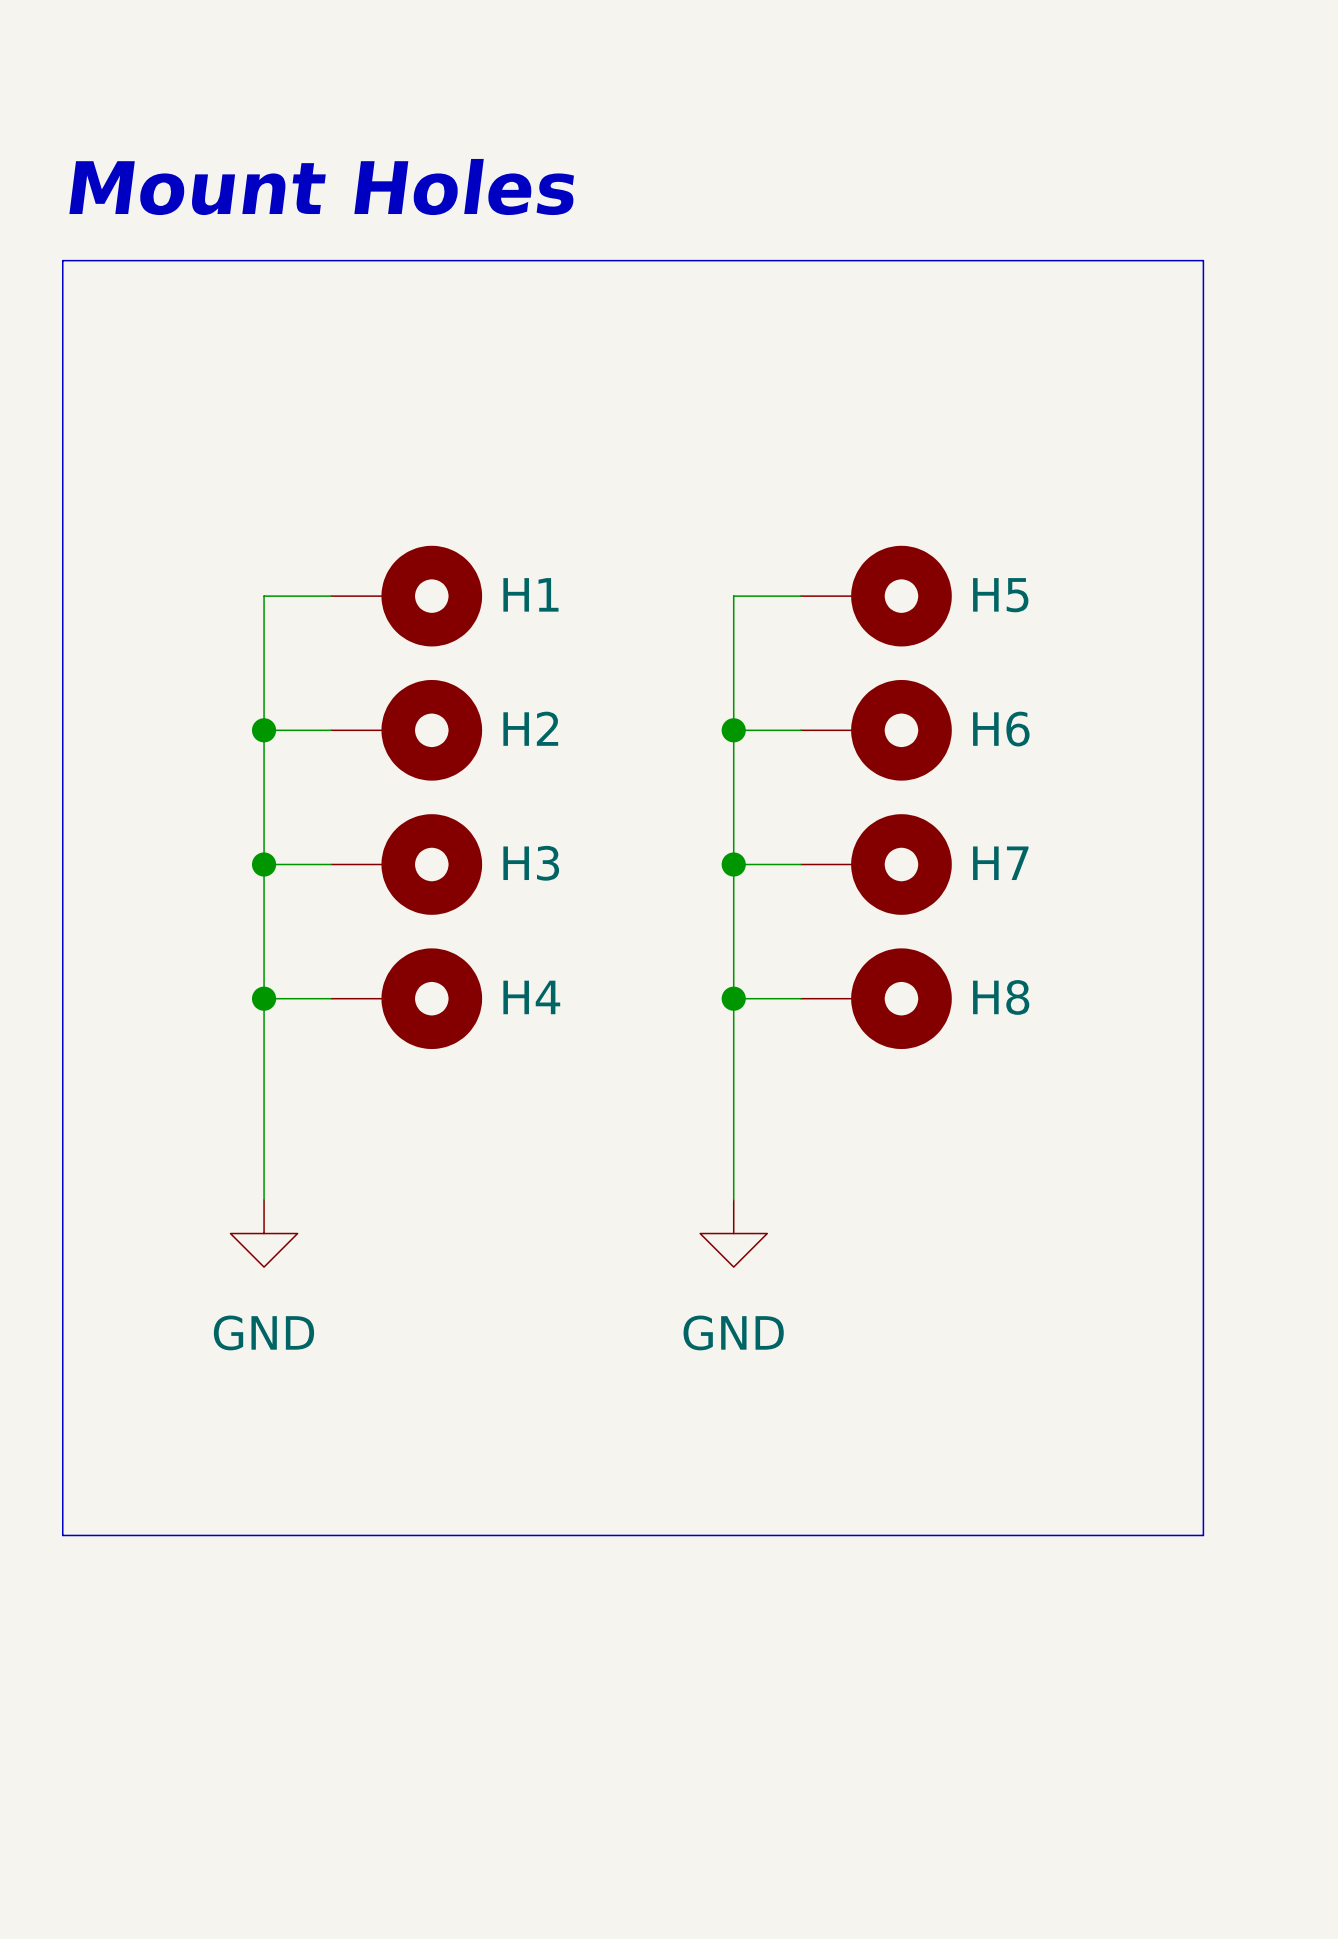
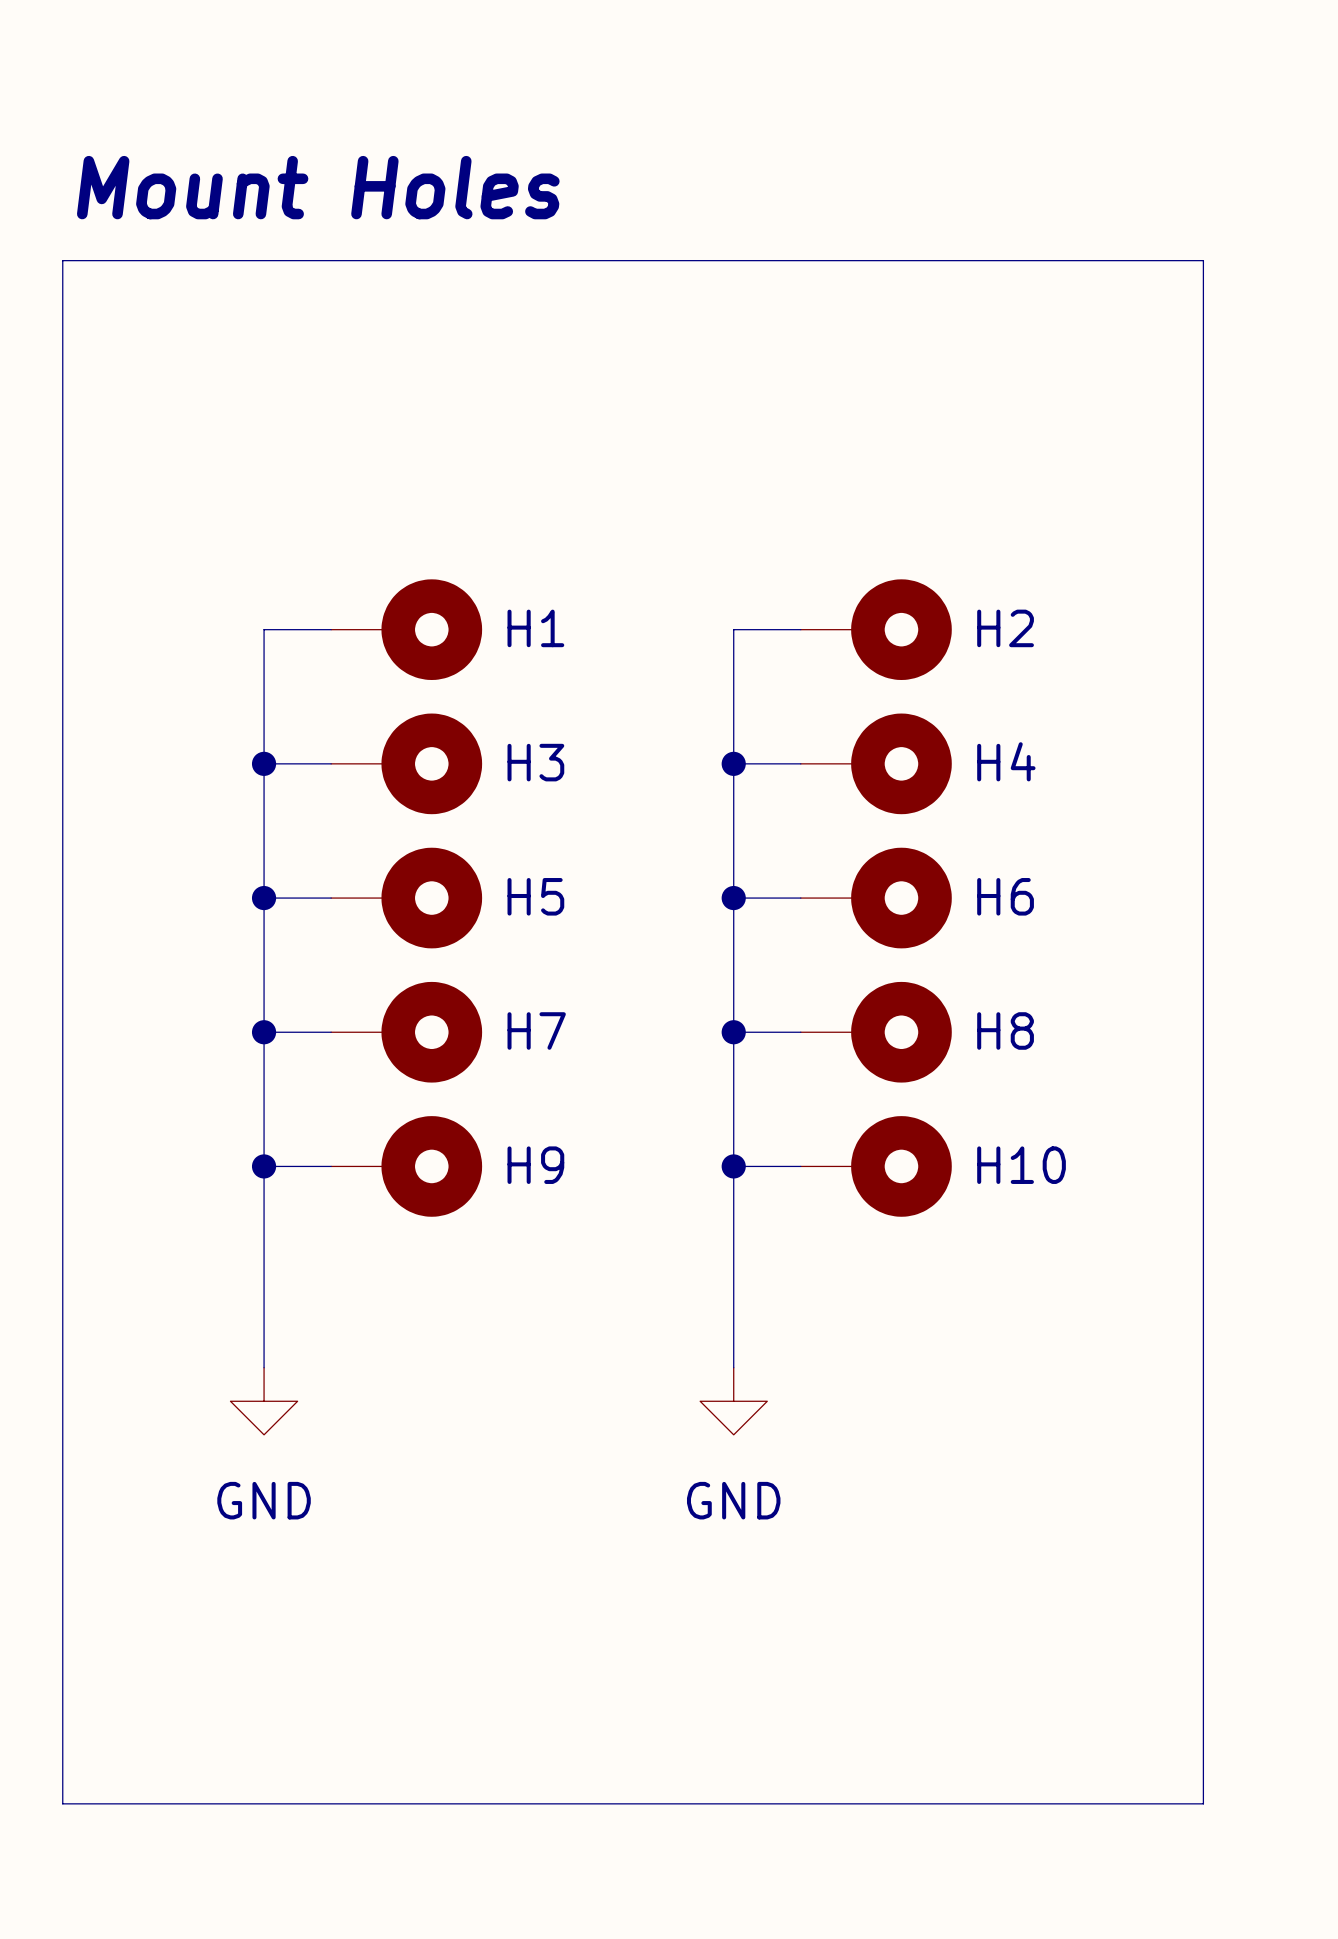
wire: (331, 596) (264, 596) (264, 629) -> (331, 629) (264, 629)
H1 position: (406, 596) -> (406, 629)
wire: (800, 596) (733, 596) (733, 629) -> (800, 629) (733, 629)
H5 position: (876, 596) -> (406, 898)
wire: (264, 730) (331, 730) -> (264, 763) (331, 763)
junction position: (264, 730) -> (264, 763)
H2 position: (406, 730) -> (876, 629)
wire: (733, 730) (800, 730) -> (733, 763) (800, 763)
junction position: (733, 730) -> (733, 763)
H6 position: (876, 730) -> (876, 898)
wire: (264, 864) (331, 864) -> (264, 898) (331, 898)
junction position: (264, 864) -> (264, 898)
H3 position: (406, 864) -> (406, 763)
wire: (733, 864) (800, 864) -> (733, 898) (800, 898)
junction position: (733, 864) -> (733, 898)
H7 position: (876, 864) -> (406, 1032)
wire: (264, 998) (331, 998) -> (264, 1032) (331, 1032)
junction position: (264, 998) -> (264, 1032)
H4 position: (406, 998) -> (876, 763)
wire: (733, 998) (800, 998) -> (733, 1032) (800, 1032)
junction position: (733, 998) -> (733, 1032)
H8 position: (876, 998) -> (876, 1032)
wire: none -> (264, 1166) (331, 1166)
junction: none -> (264, 1166)
H9: none -> (406, 1166)
wire: none -> (733, 1166) (800, 1166)
junction: none -> (733, 1166)
H10: none -> (876, 1166)
wire: none -> (264, 1199) (264, 1367)
wire: none -> (733, 1199) (733, 1367)
power symbol position: GND (264, 1233) -> GND (264, 1401)
power symbol position: GND (733, 1233) -> GND (733, 1401)
line: (62, 1535) (1203, 1535) -> (62, 1535) (62, 1803) (1203, 1803) (1203, 1535)

